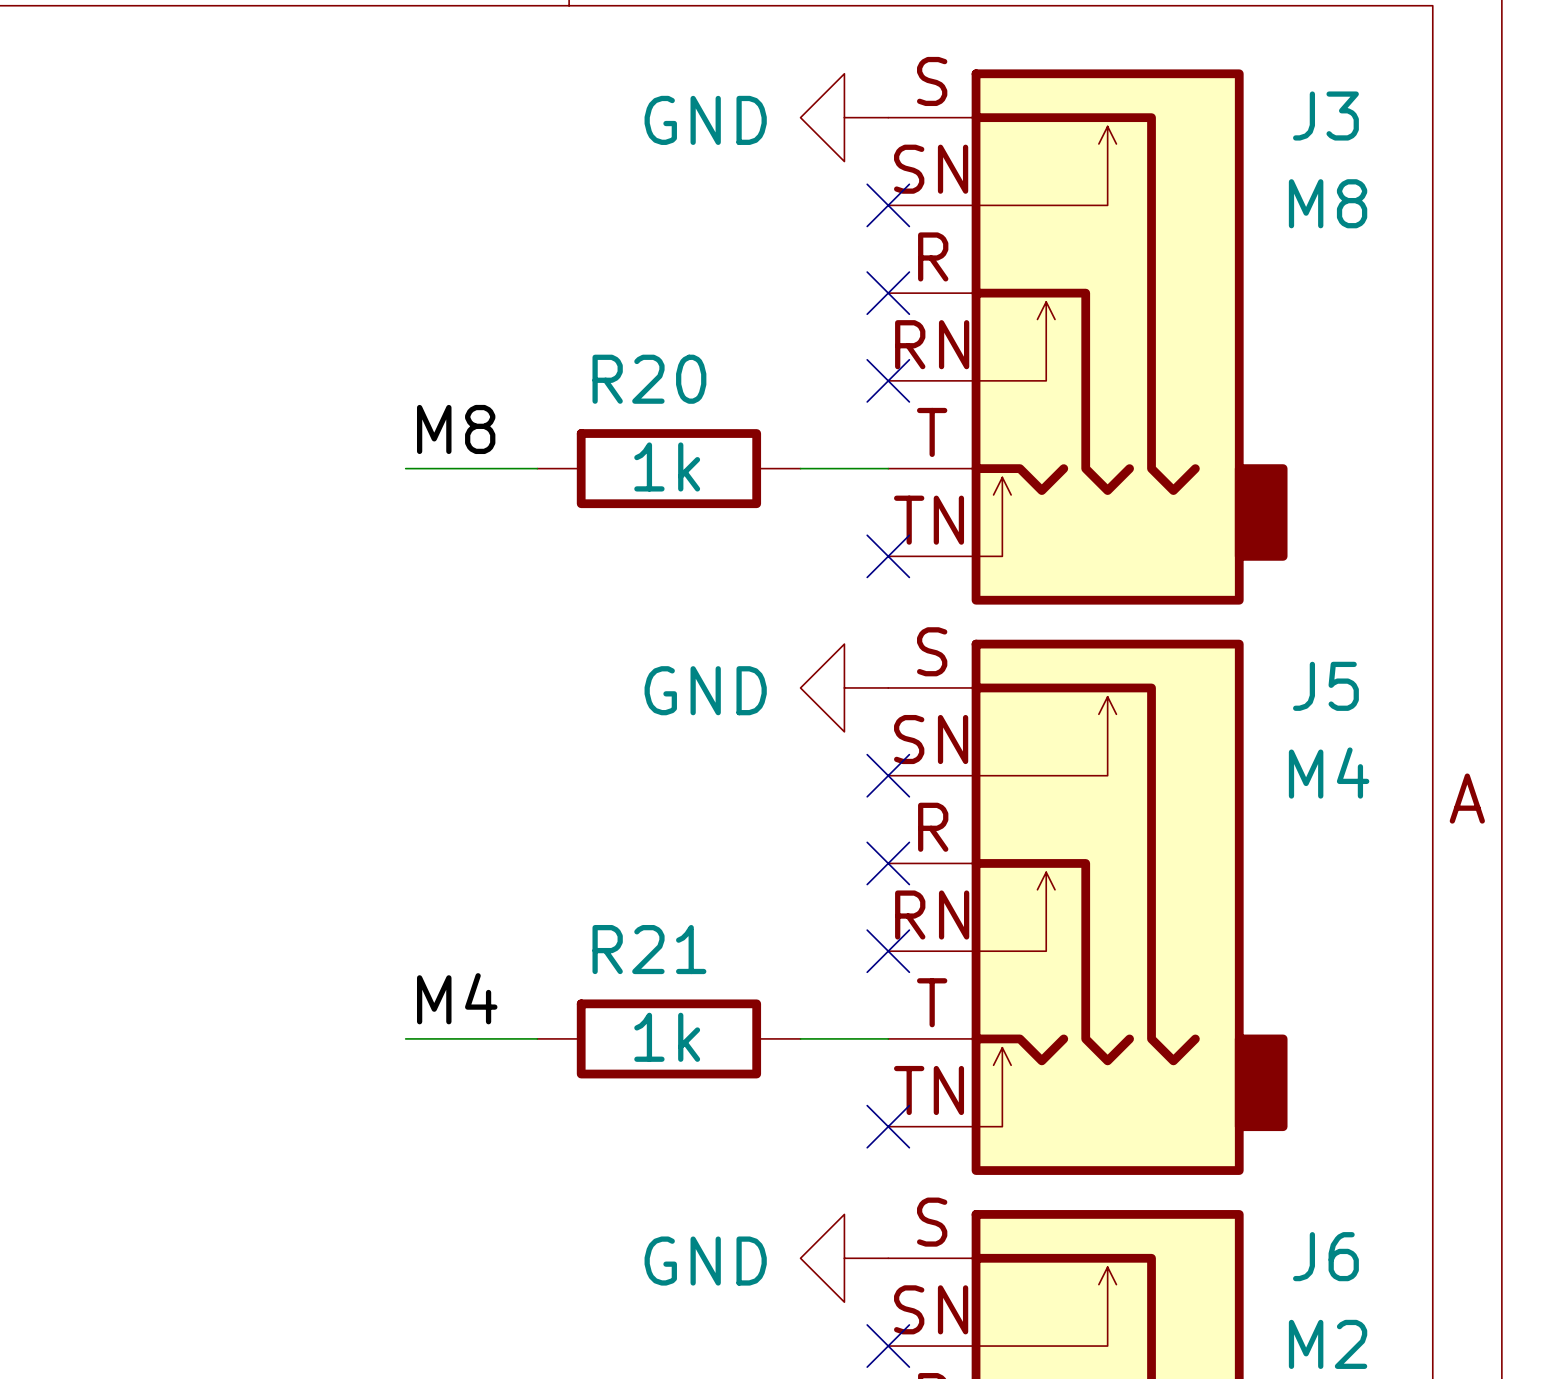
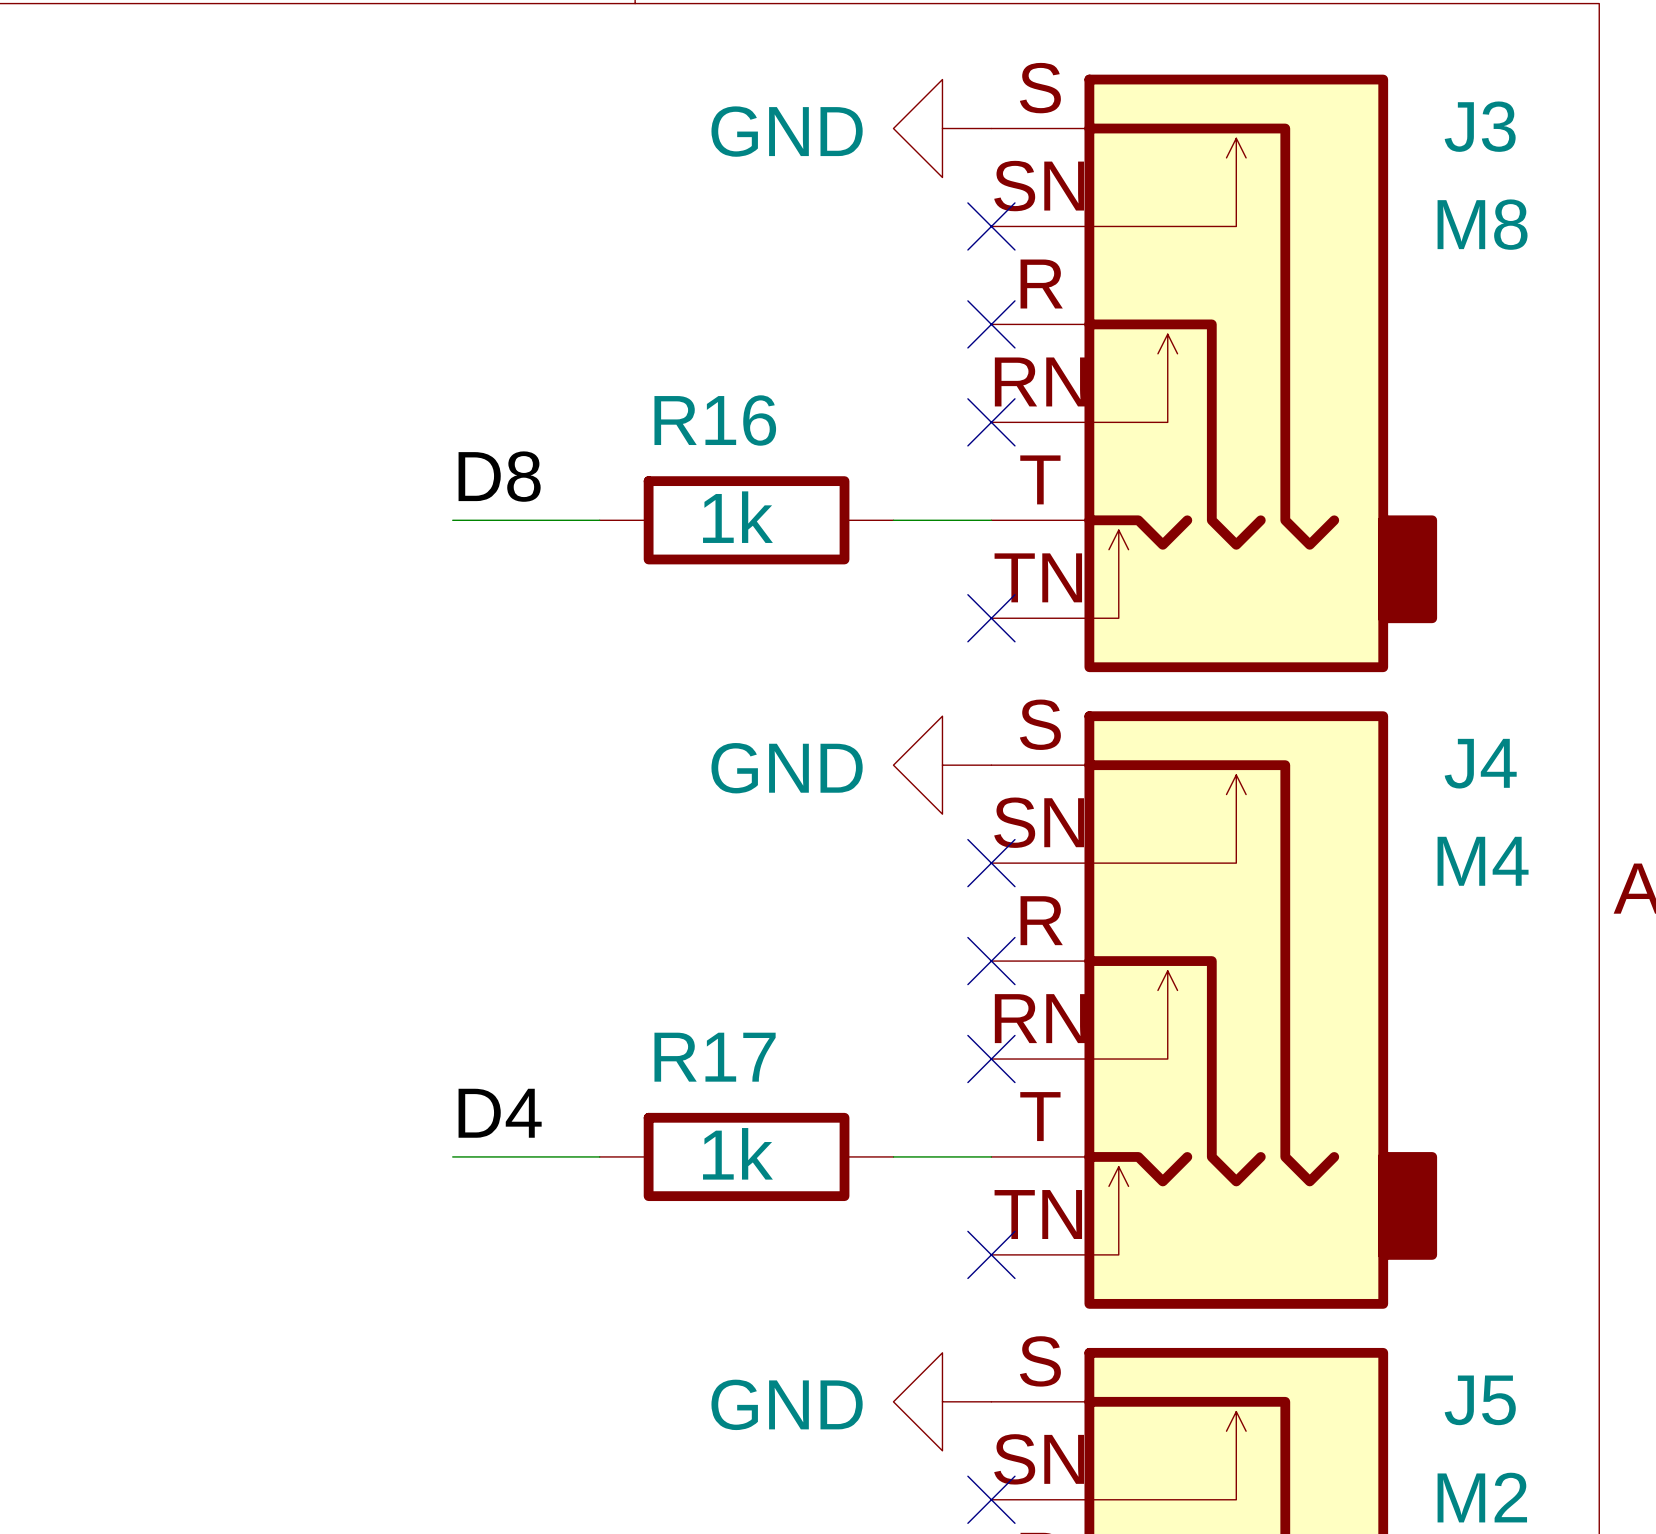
R20 name: R20 (649, 379) -> R16 (715, 420)
label: M8 (456, 429) -> D8 (499, 476)
J5 name: J5 (1325, 686) -> J4 (1480, 763)
R21 name: R21 (649, 949) -> R17 (715, 1057)
label: M4 (457, 998) -> D4 (500, 1113)
J6 name: J6 (1325, 1256) -> J5 (1480, 1400)

